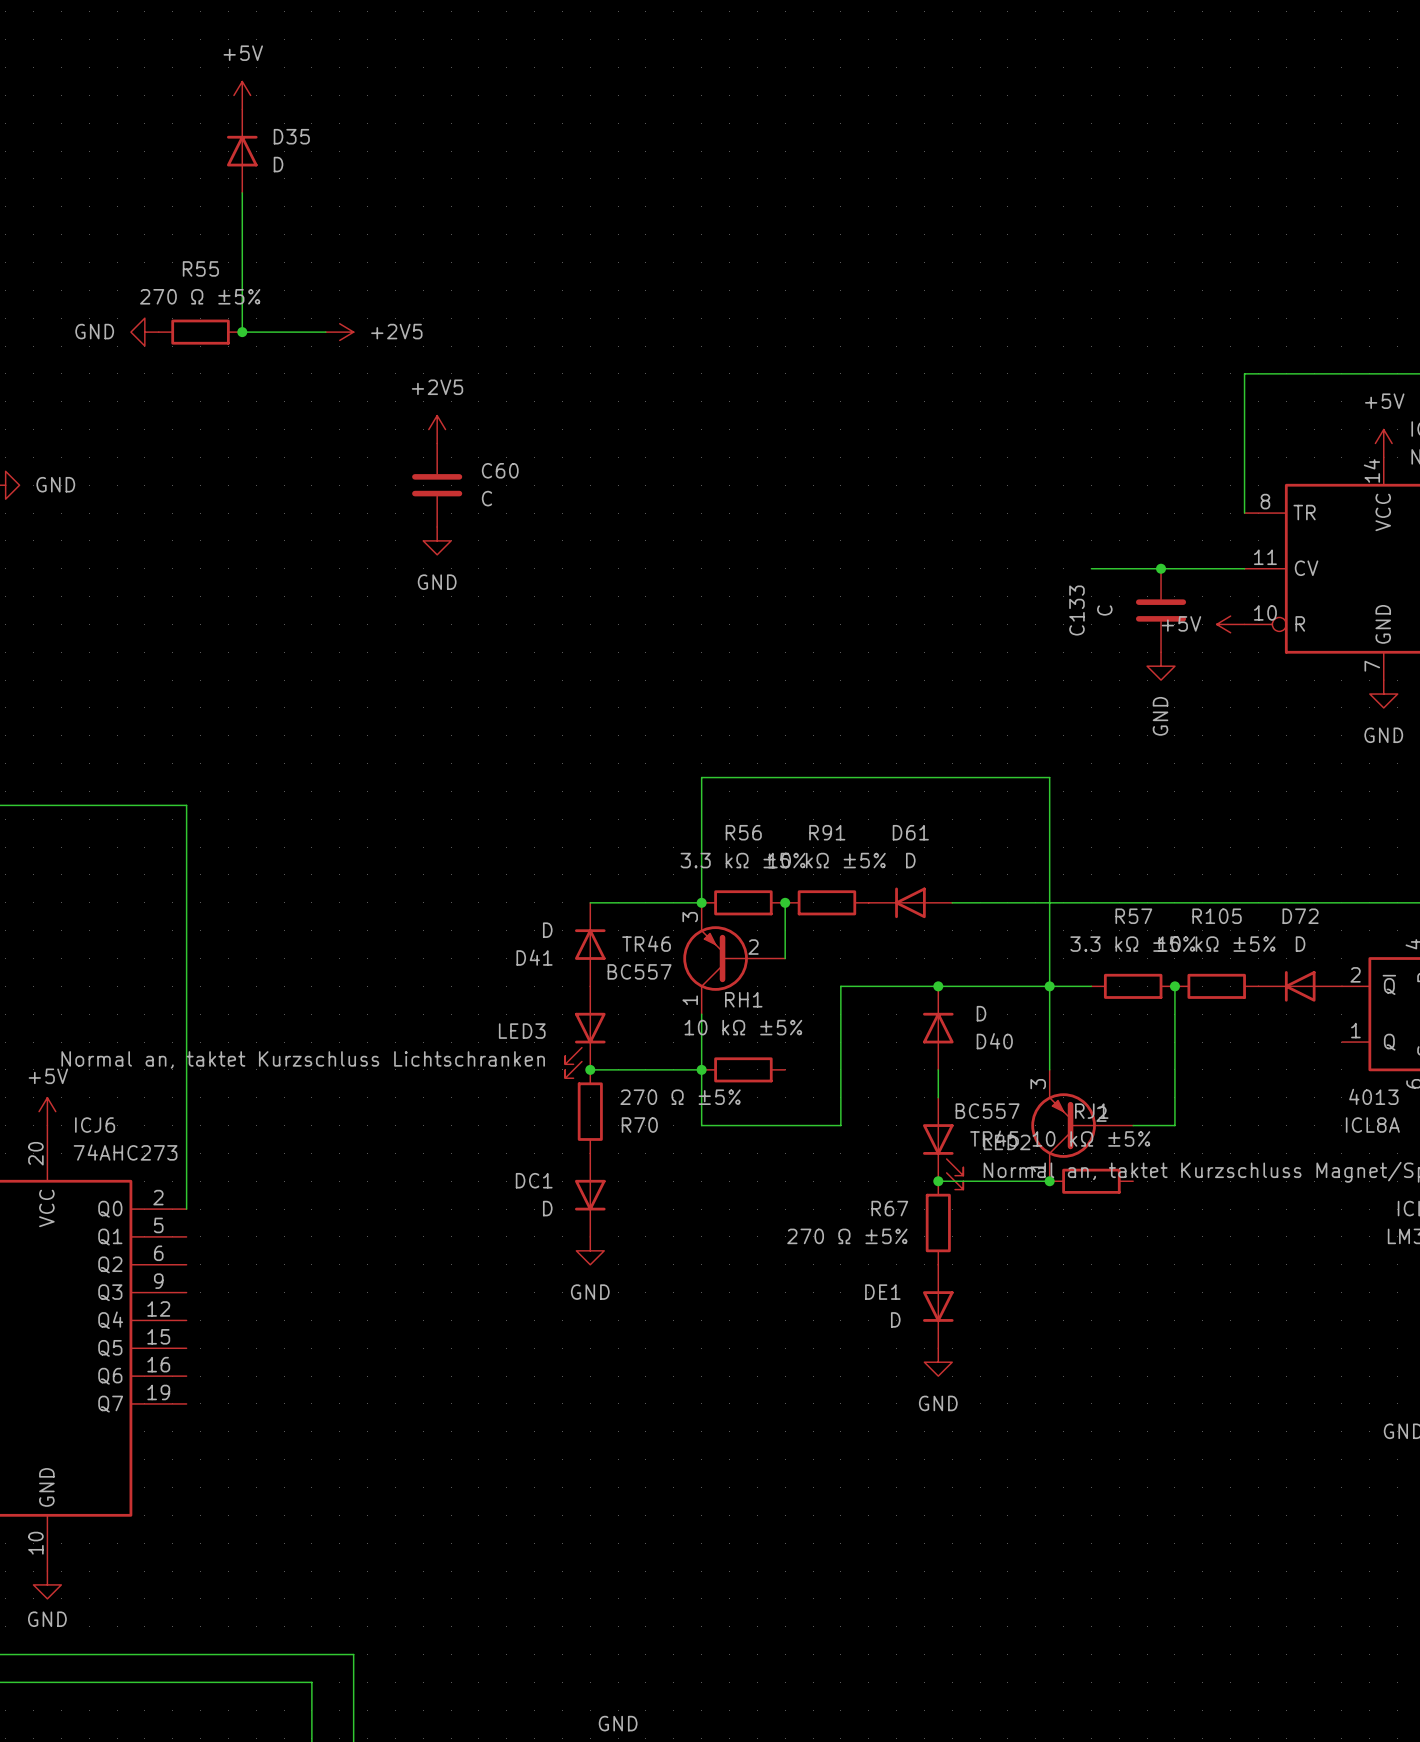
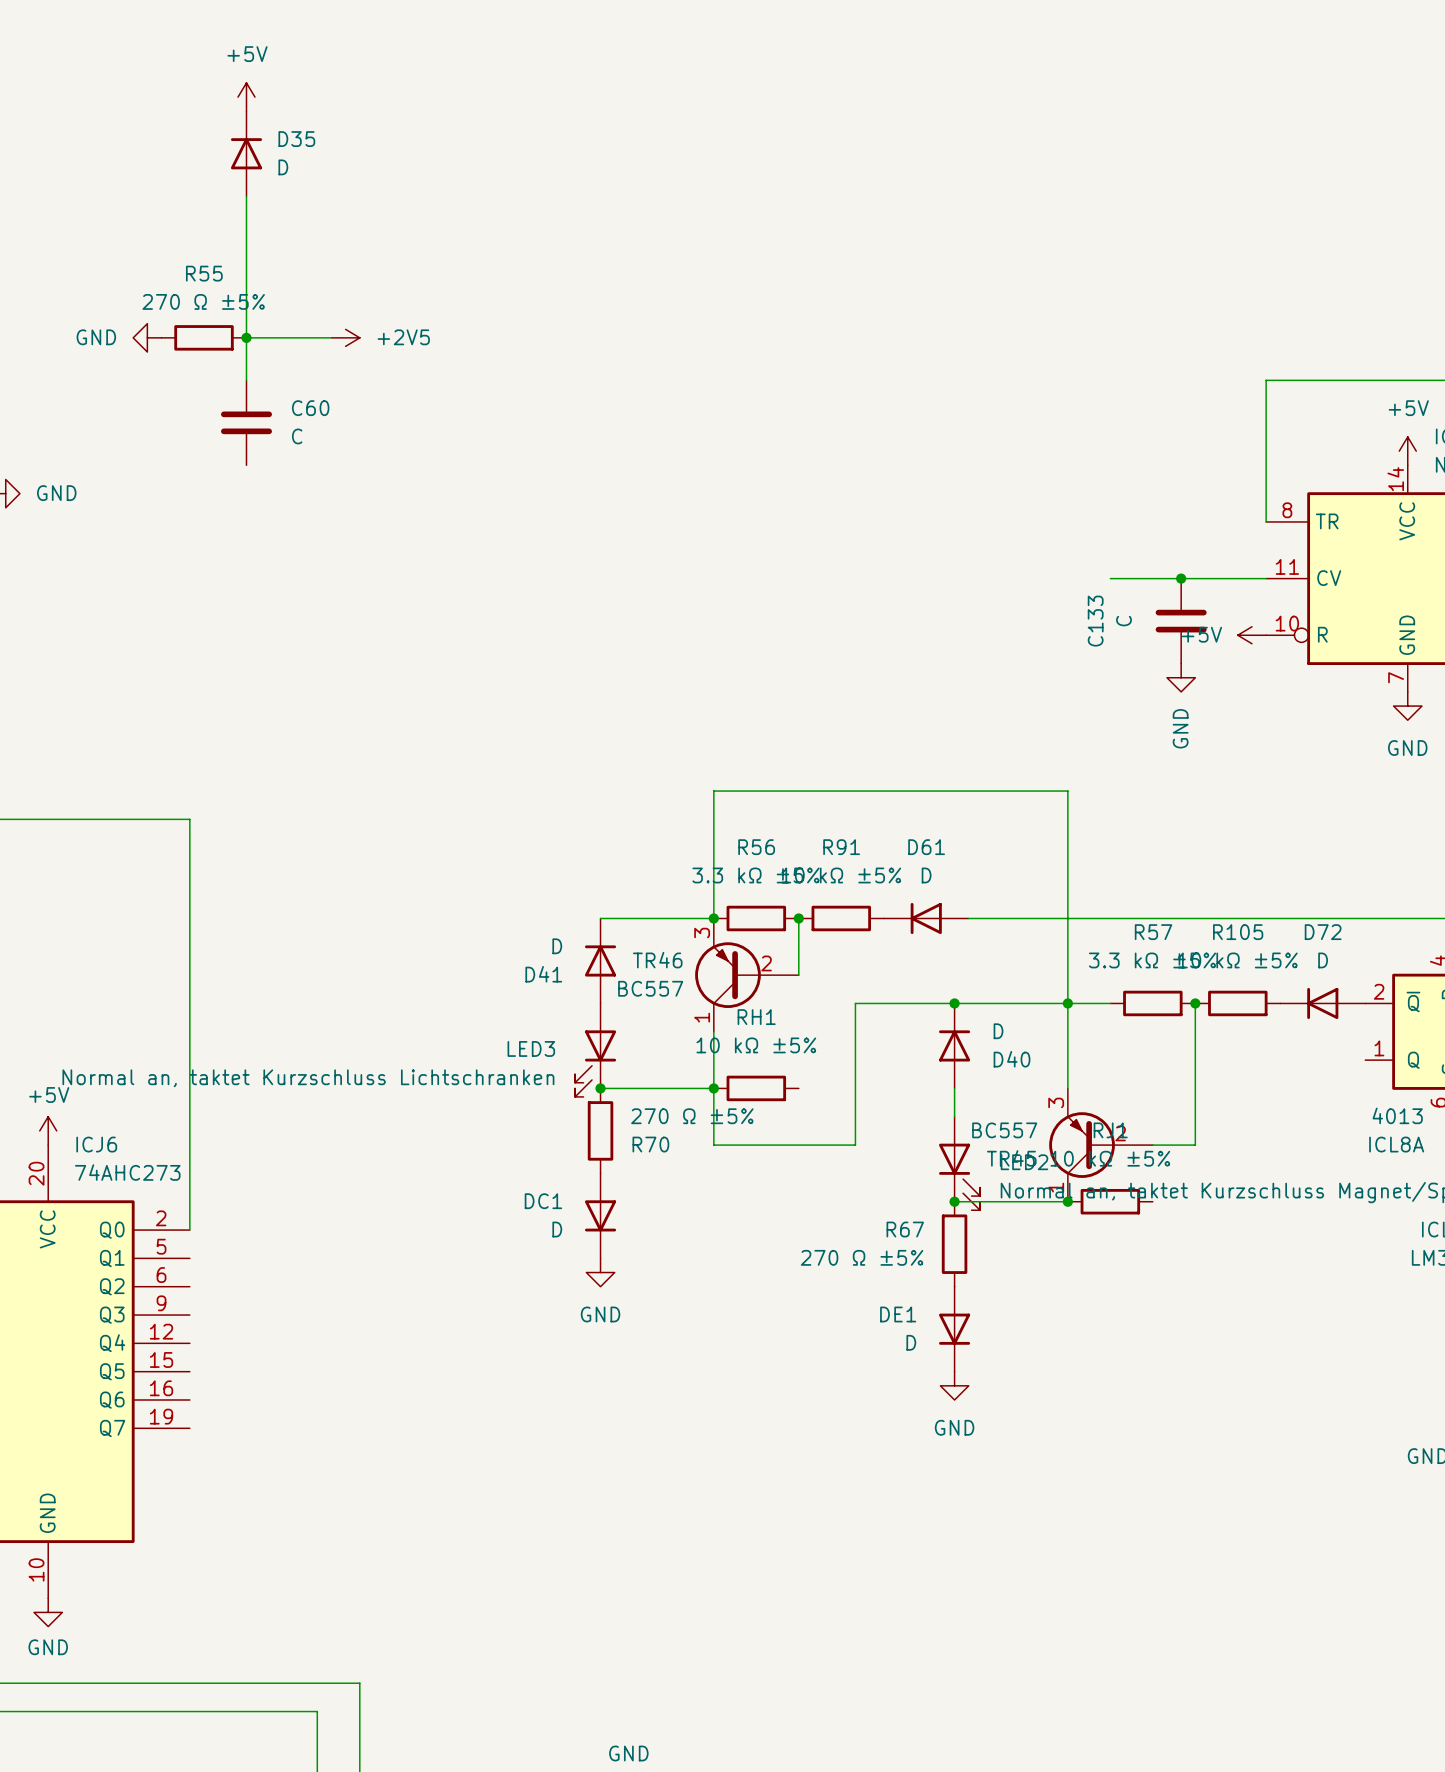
wire: none -> (246, 337) (246, 380)
power symbol: +2V5 (437, 429) -> none
C60 position: (437, 485) -> (246, 422)
power symbol: GND (437, 540) -> none

